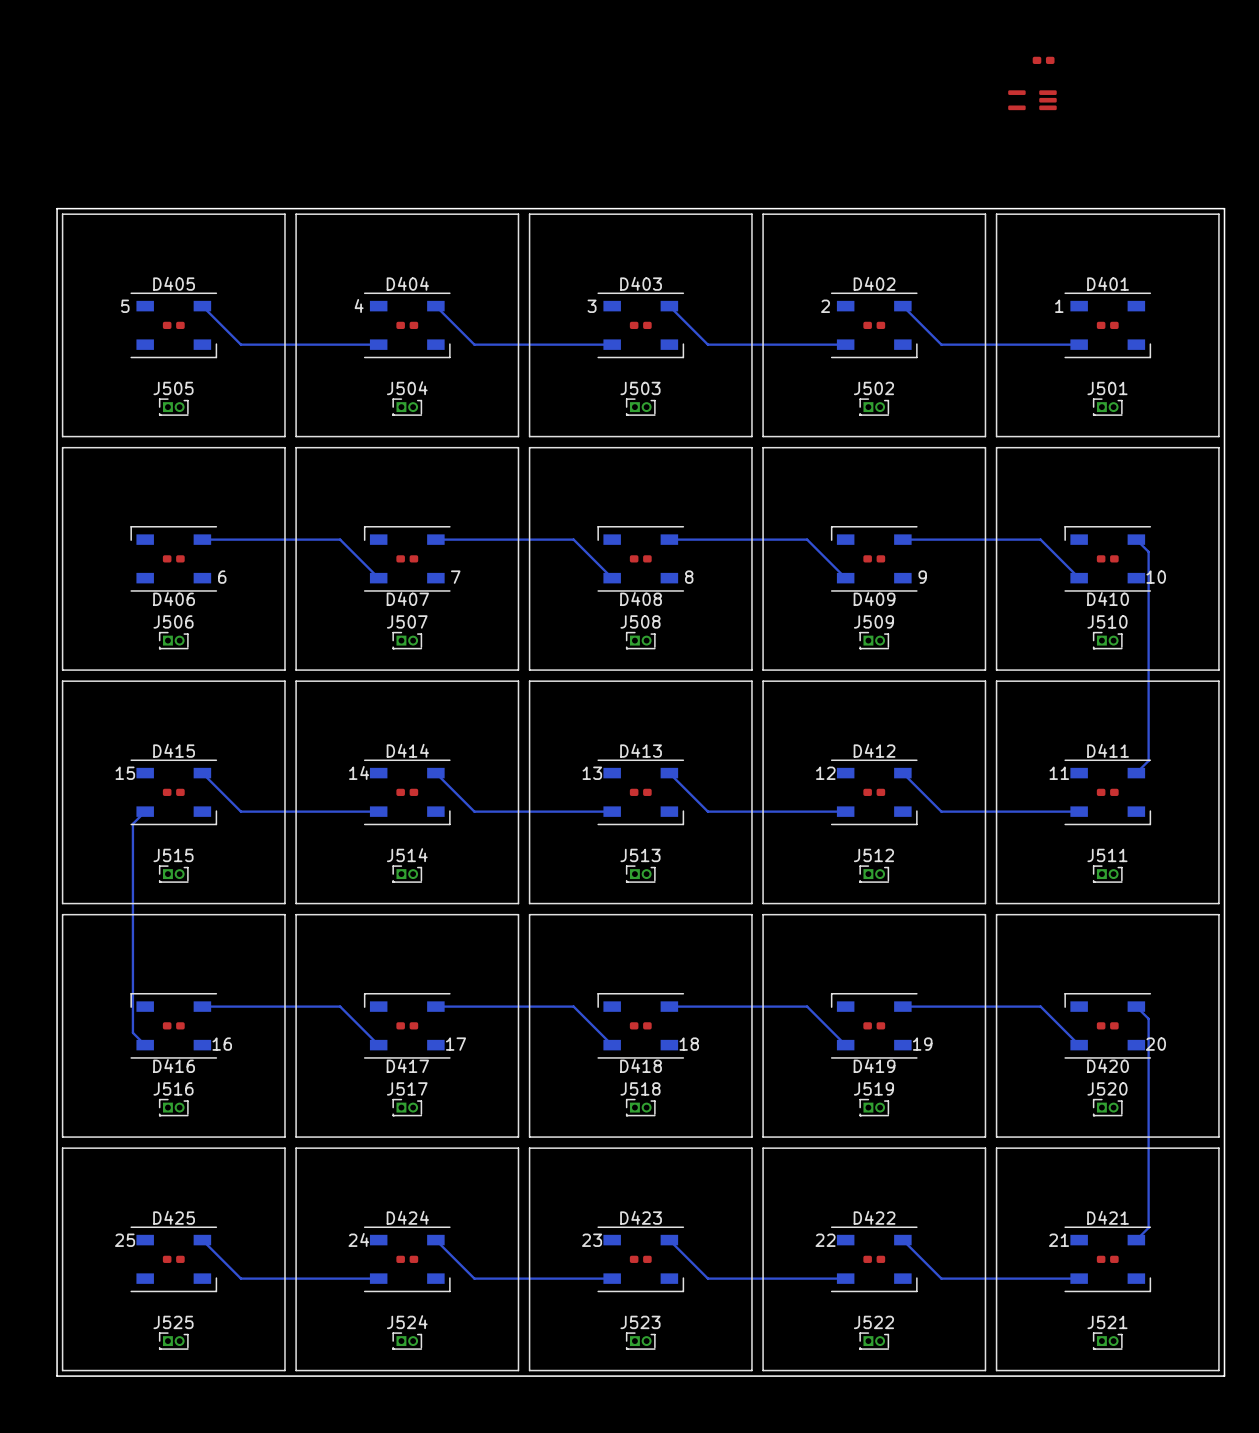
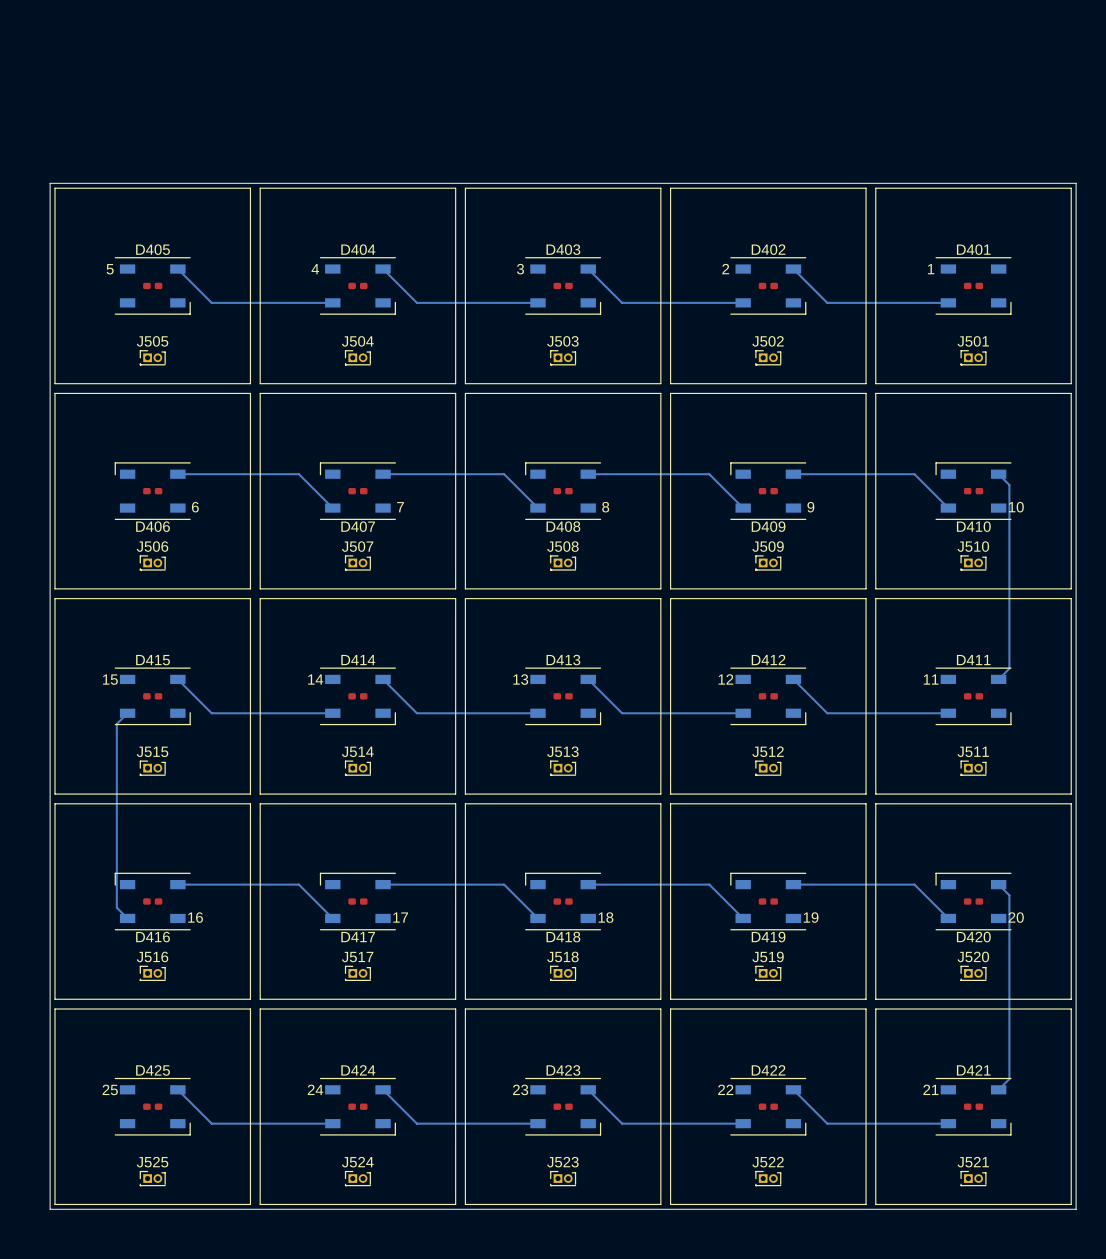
part: (1043, 60) -> none
part: (1032, 100) -> none

